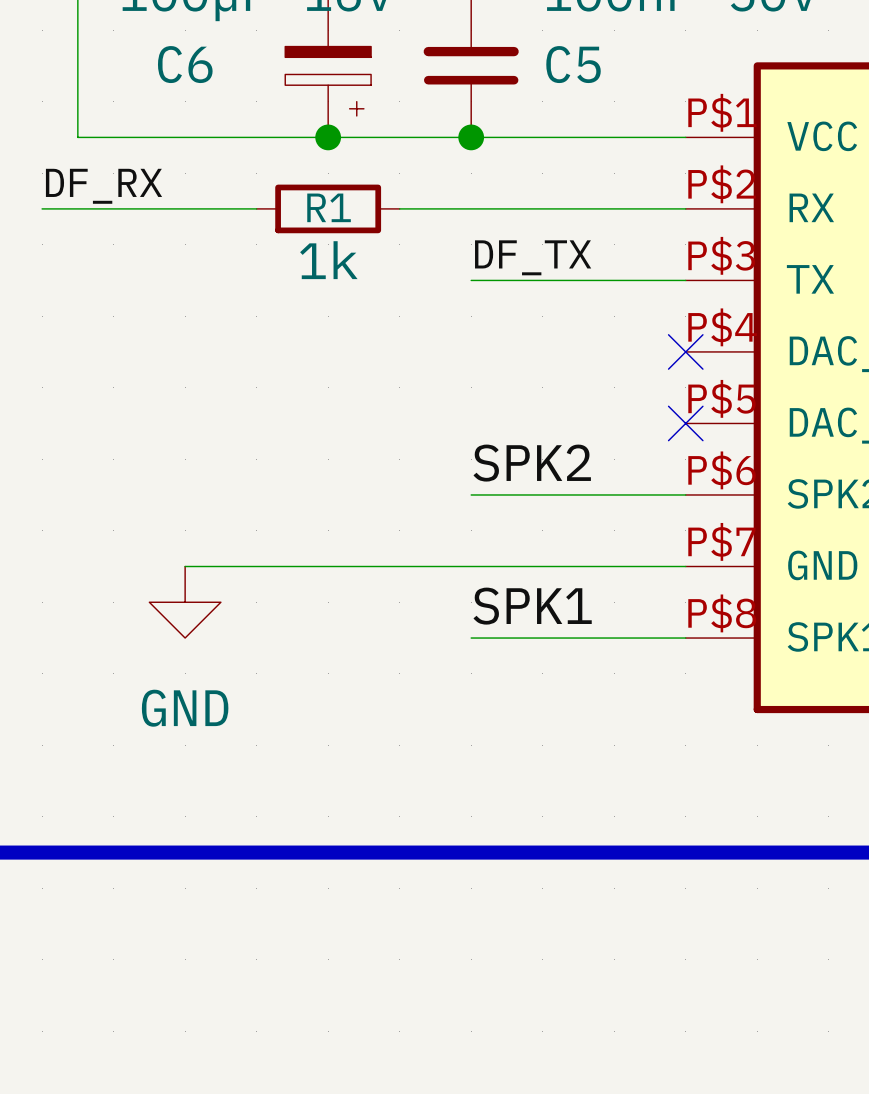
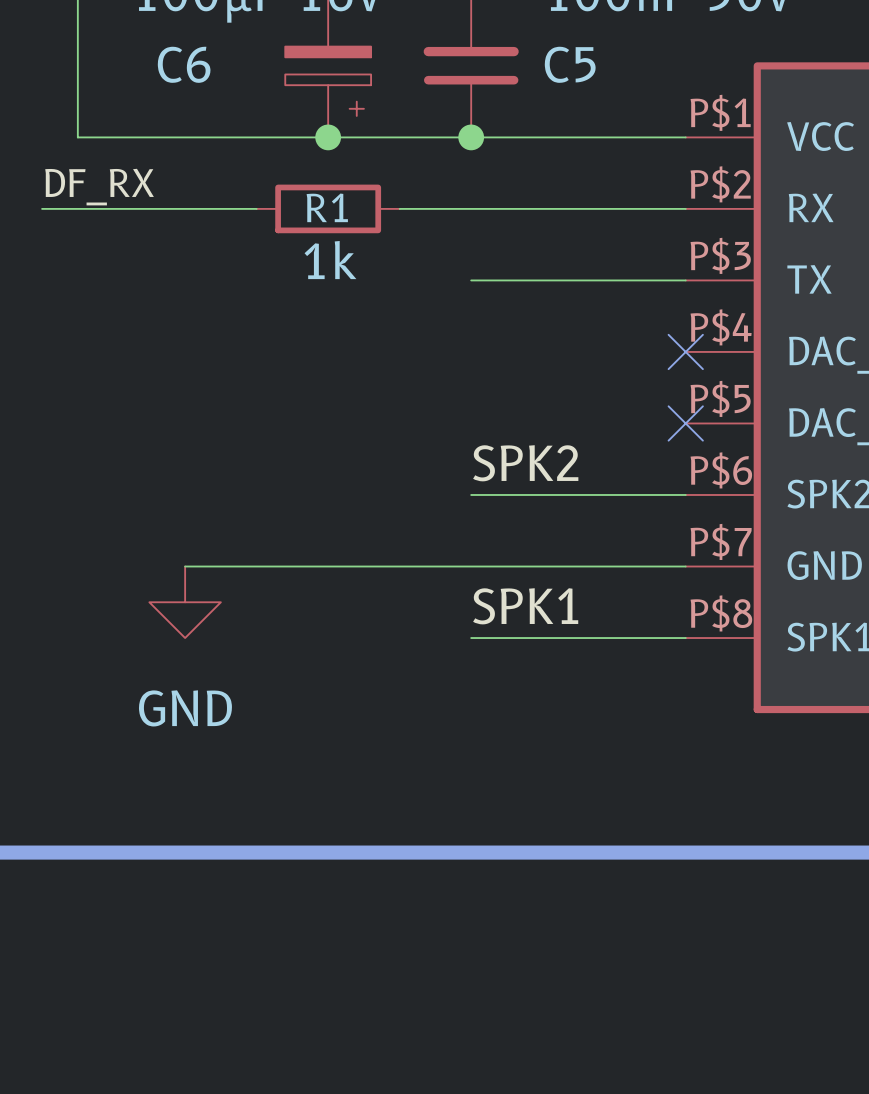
label: DF_TX (533, 257) -> none

